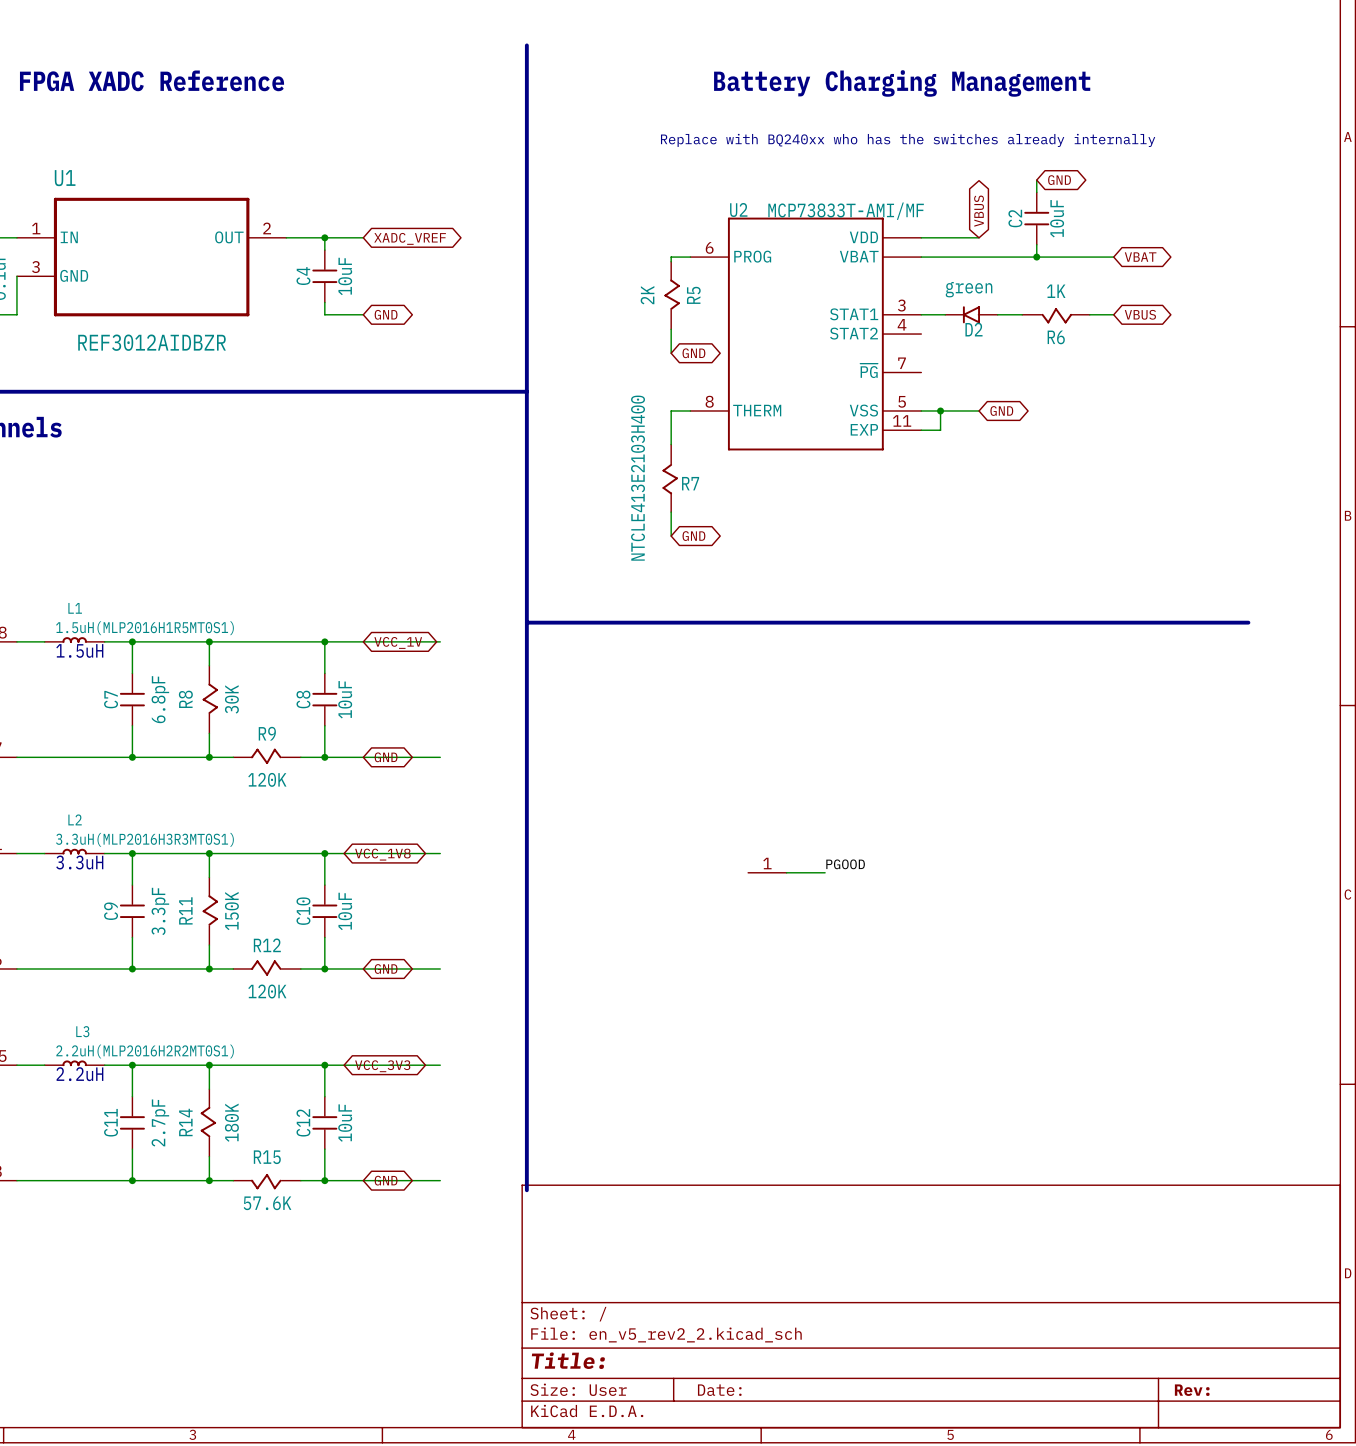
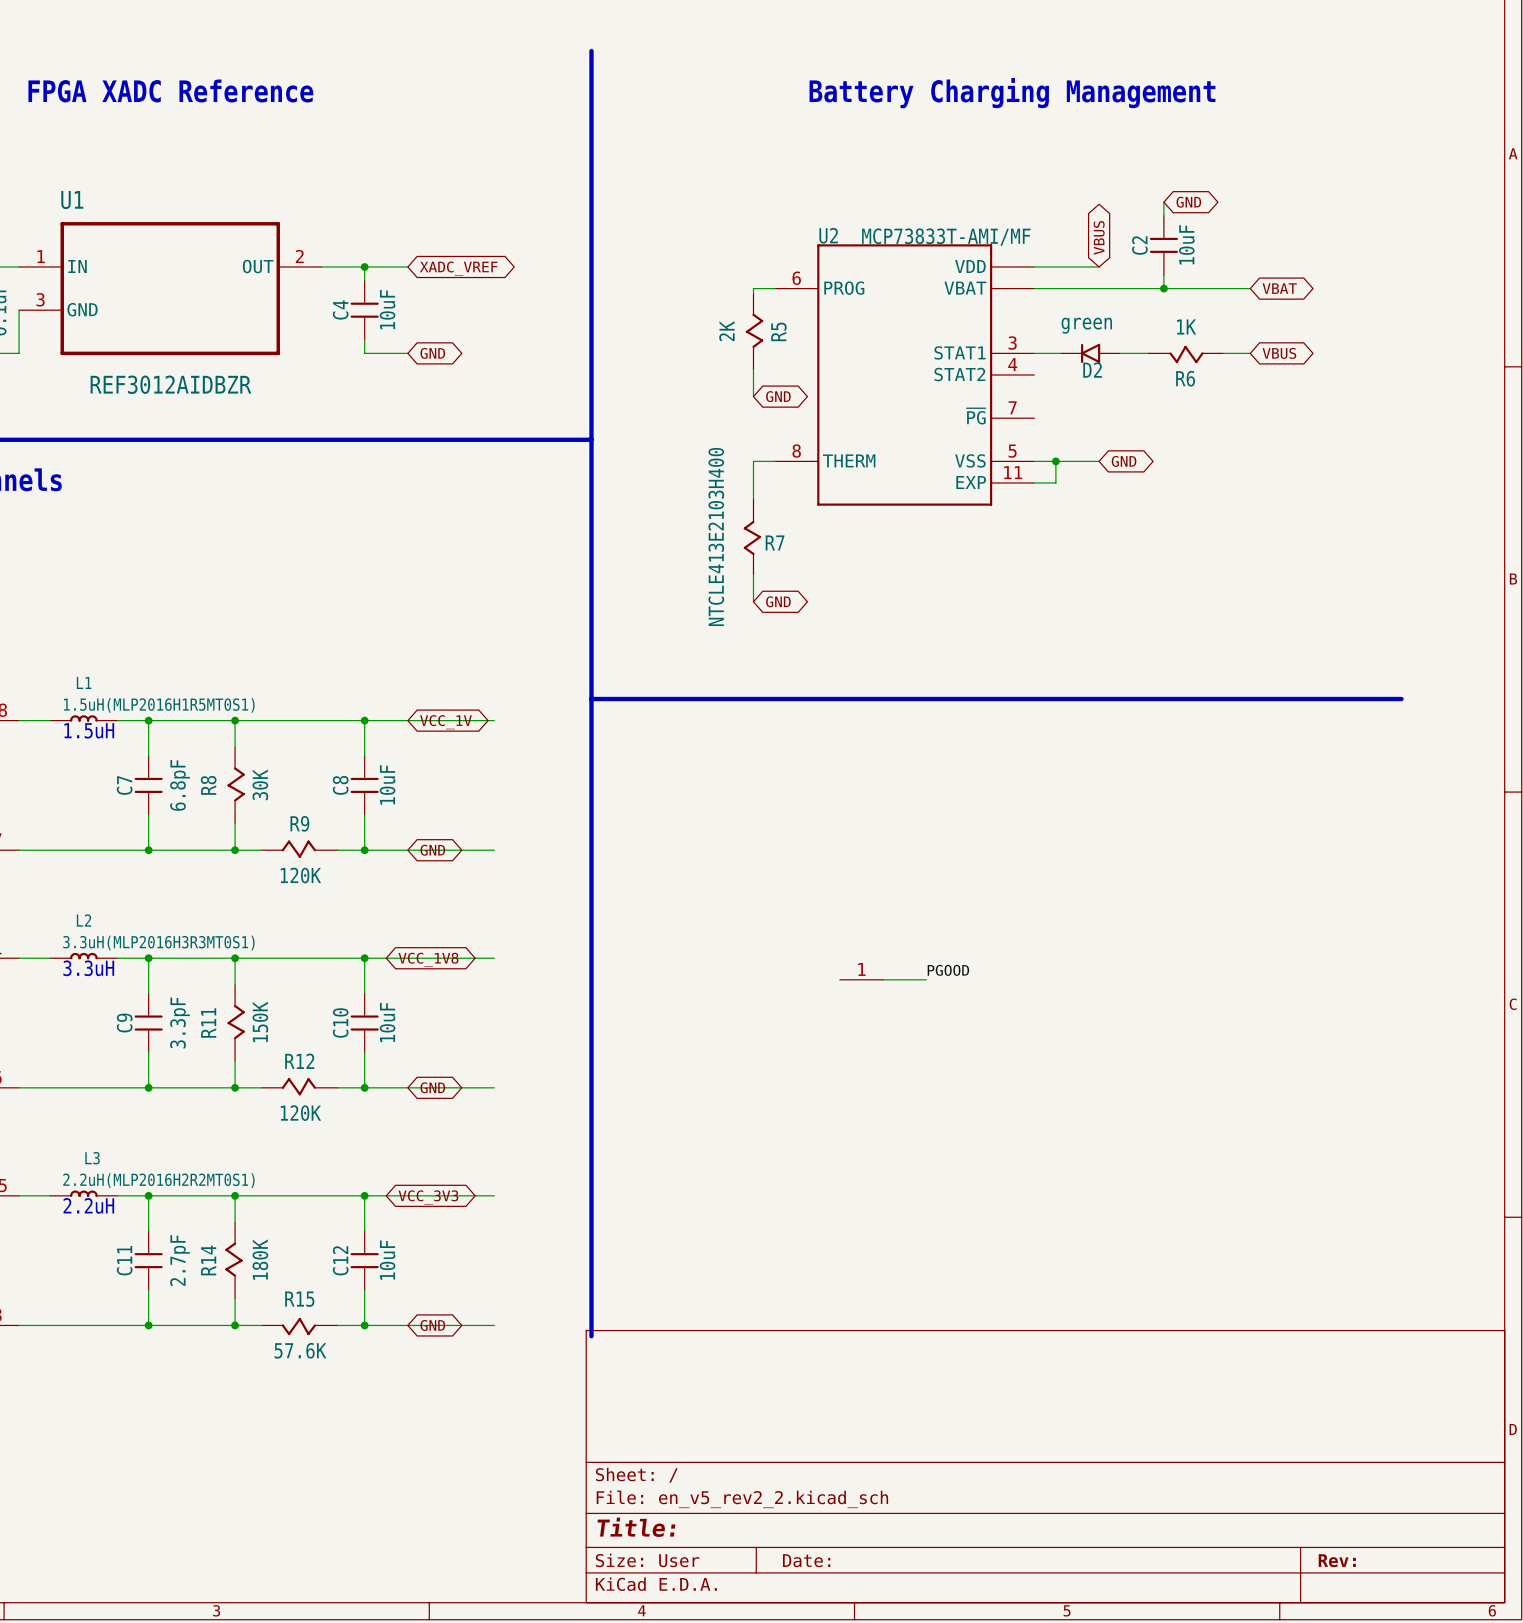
text: Replace with BQ240xx who has the switches already internally (908, 140) -> none

